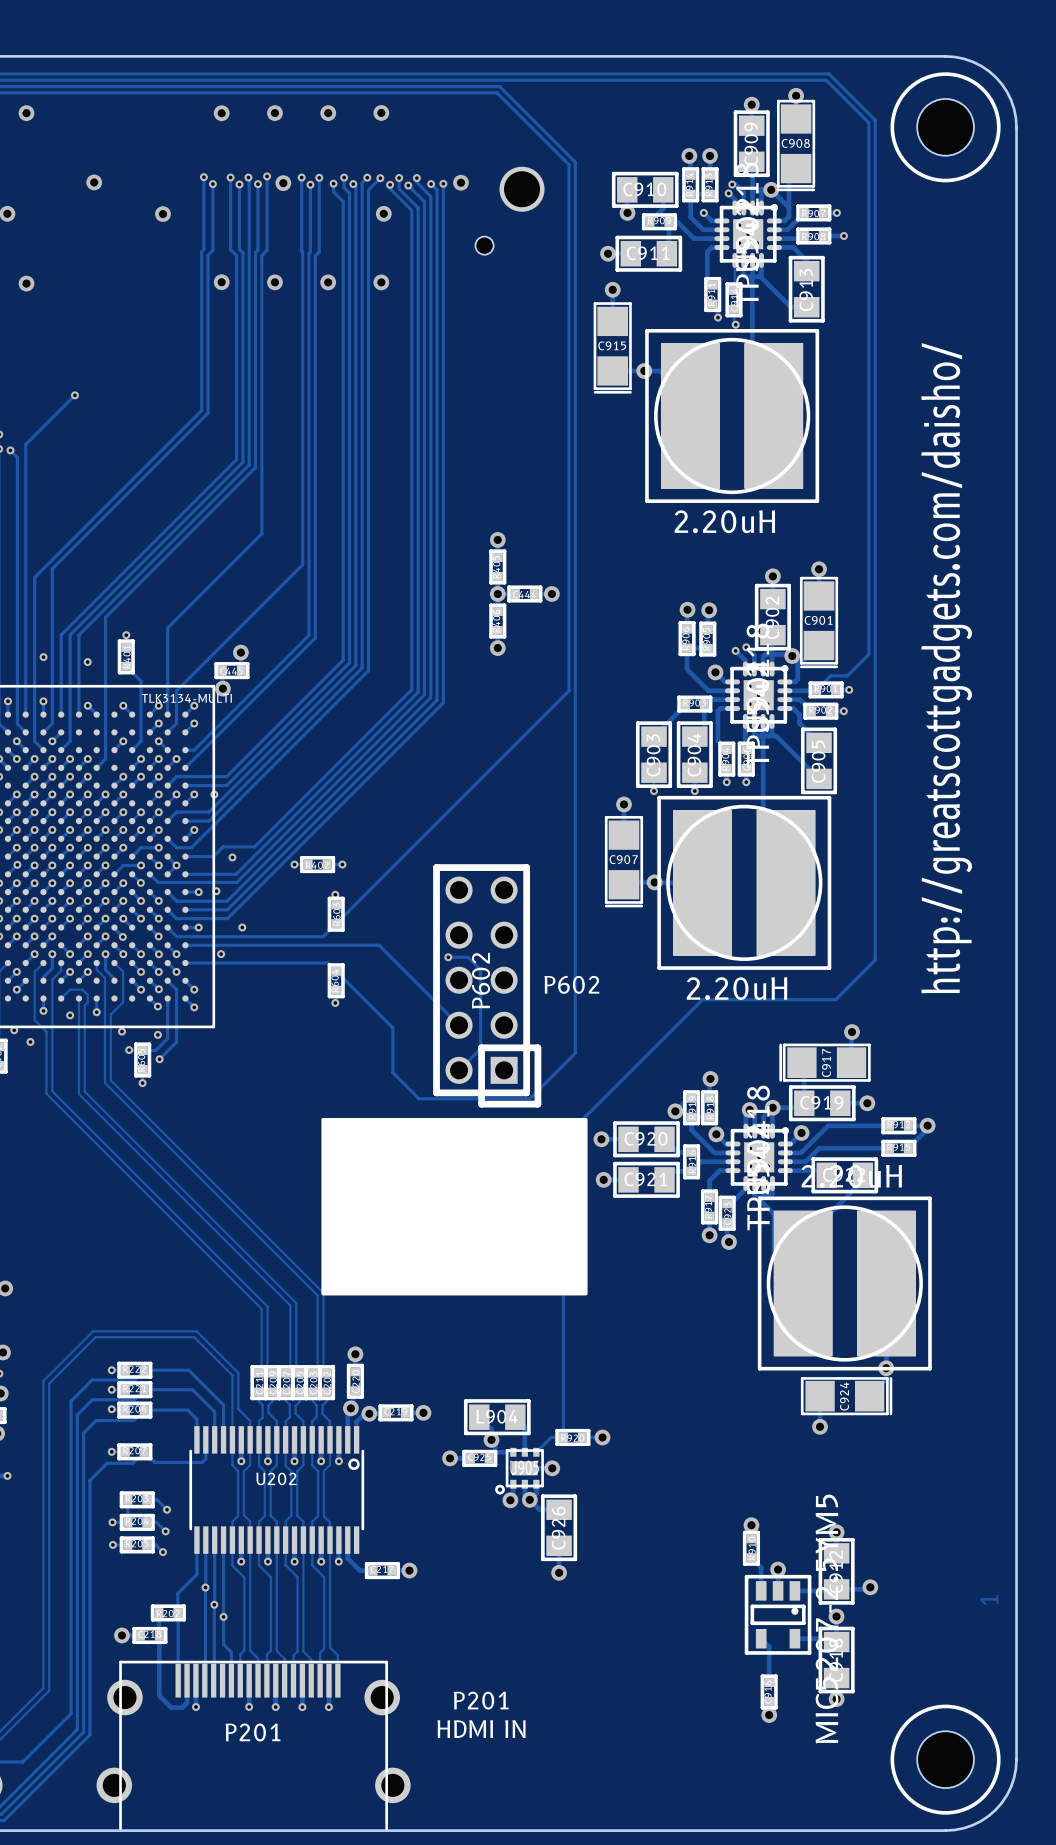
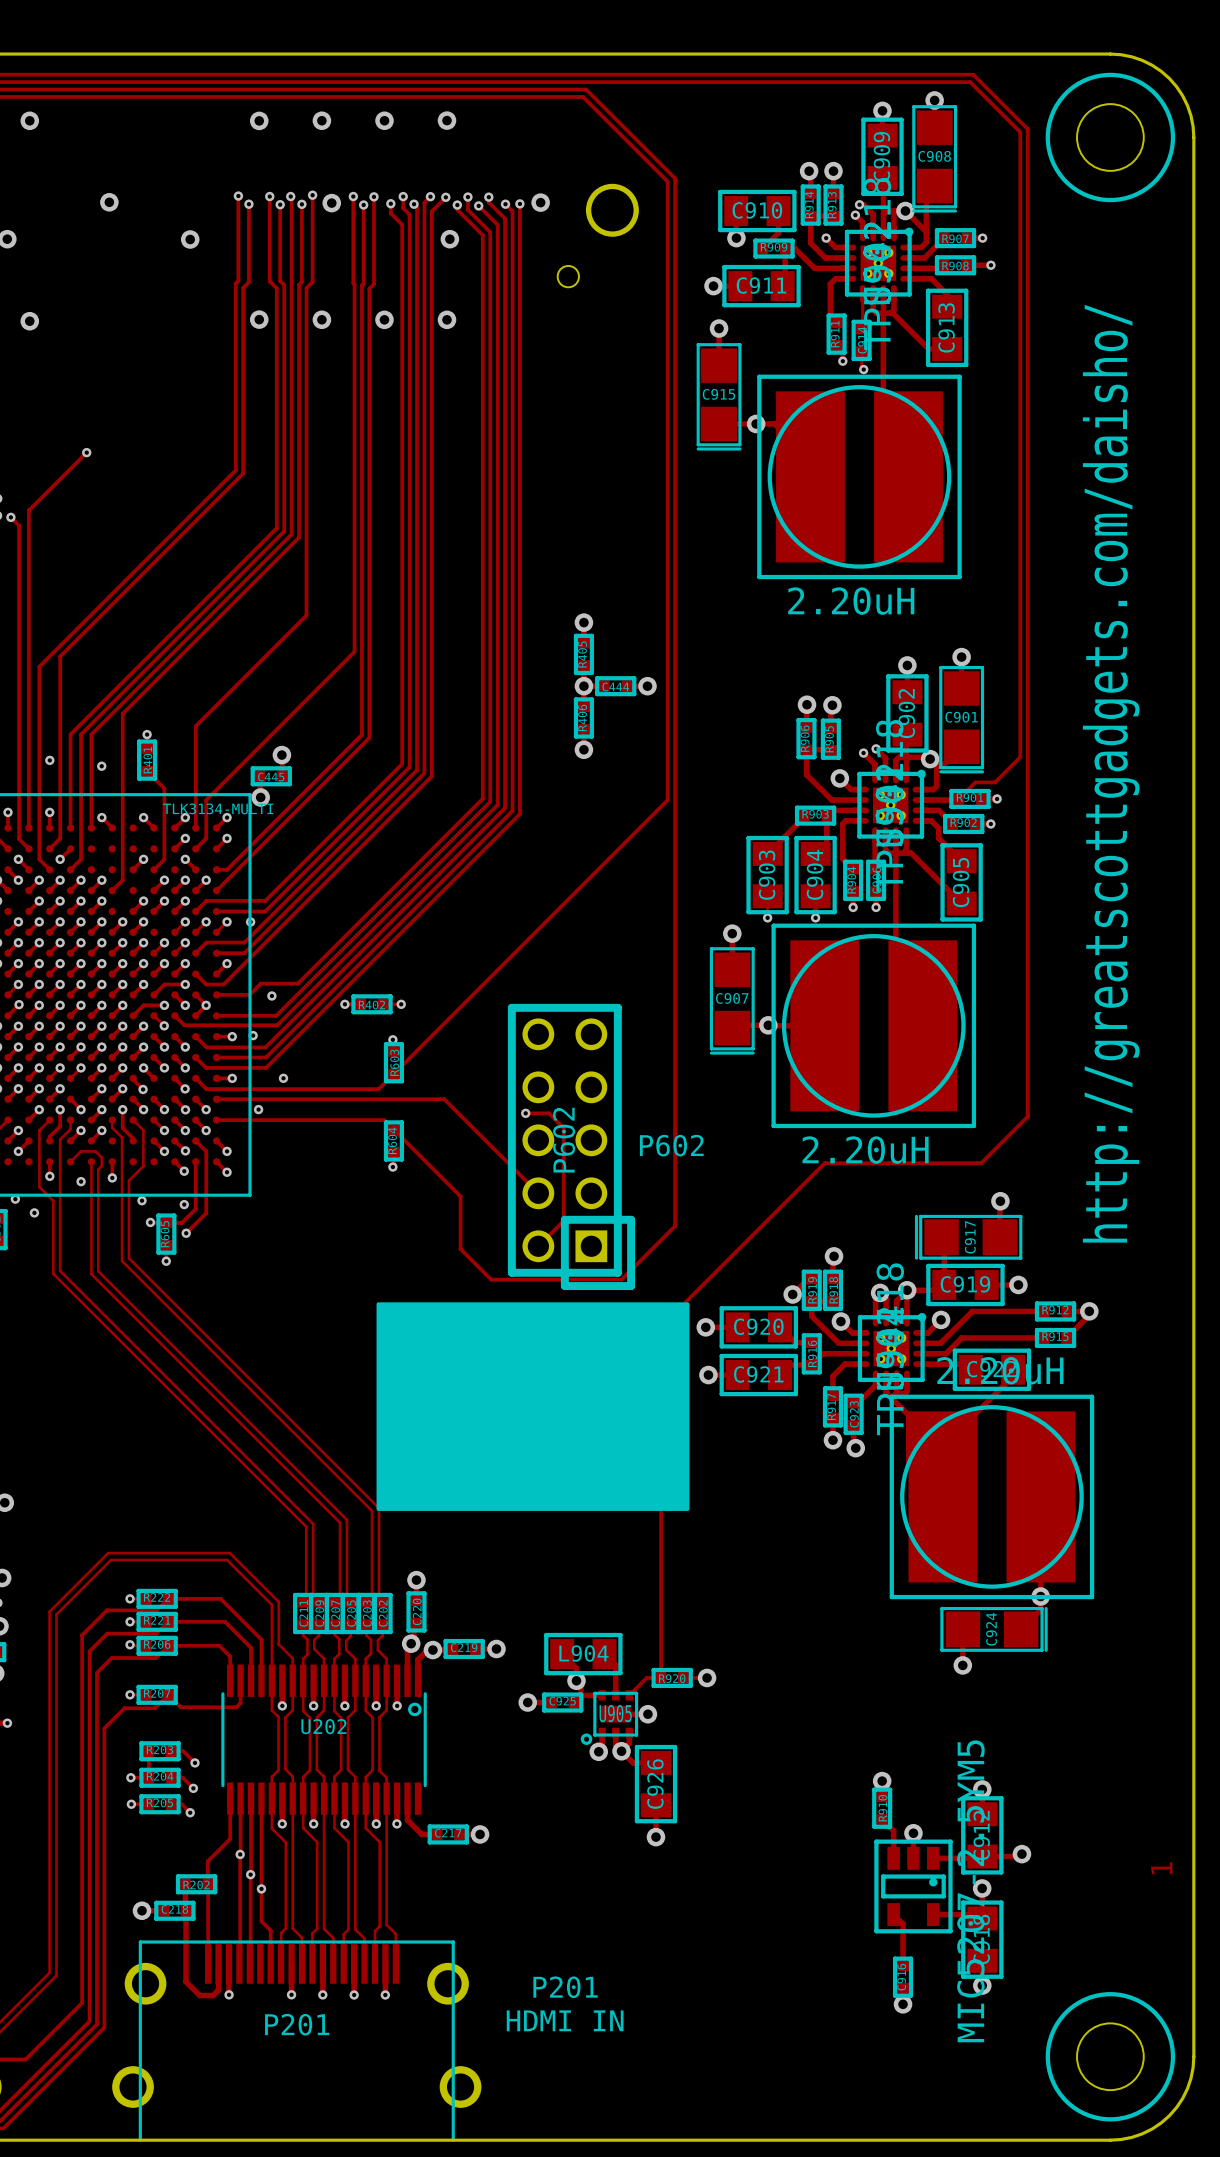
part footprint: [645, 329, 820, 503] -> [757, 374, 962, 580]
part footprint: [657, 795, 832, 970] -> [771, 923, 977, 1129]
part footprint: [757, 1196, 932, 1371] -> [889, 1394, 1095, 1600]

